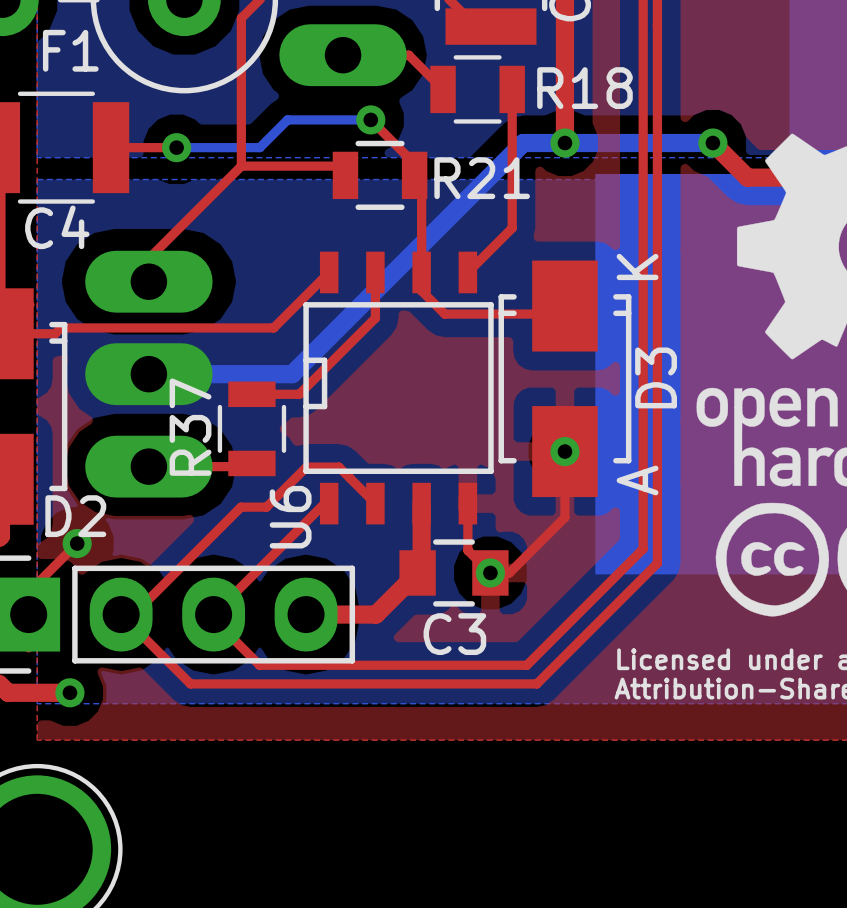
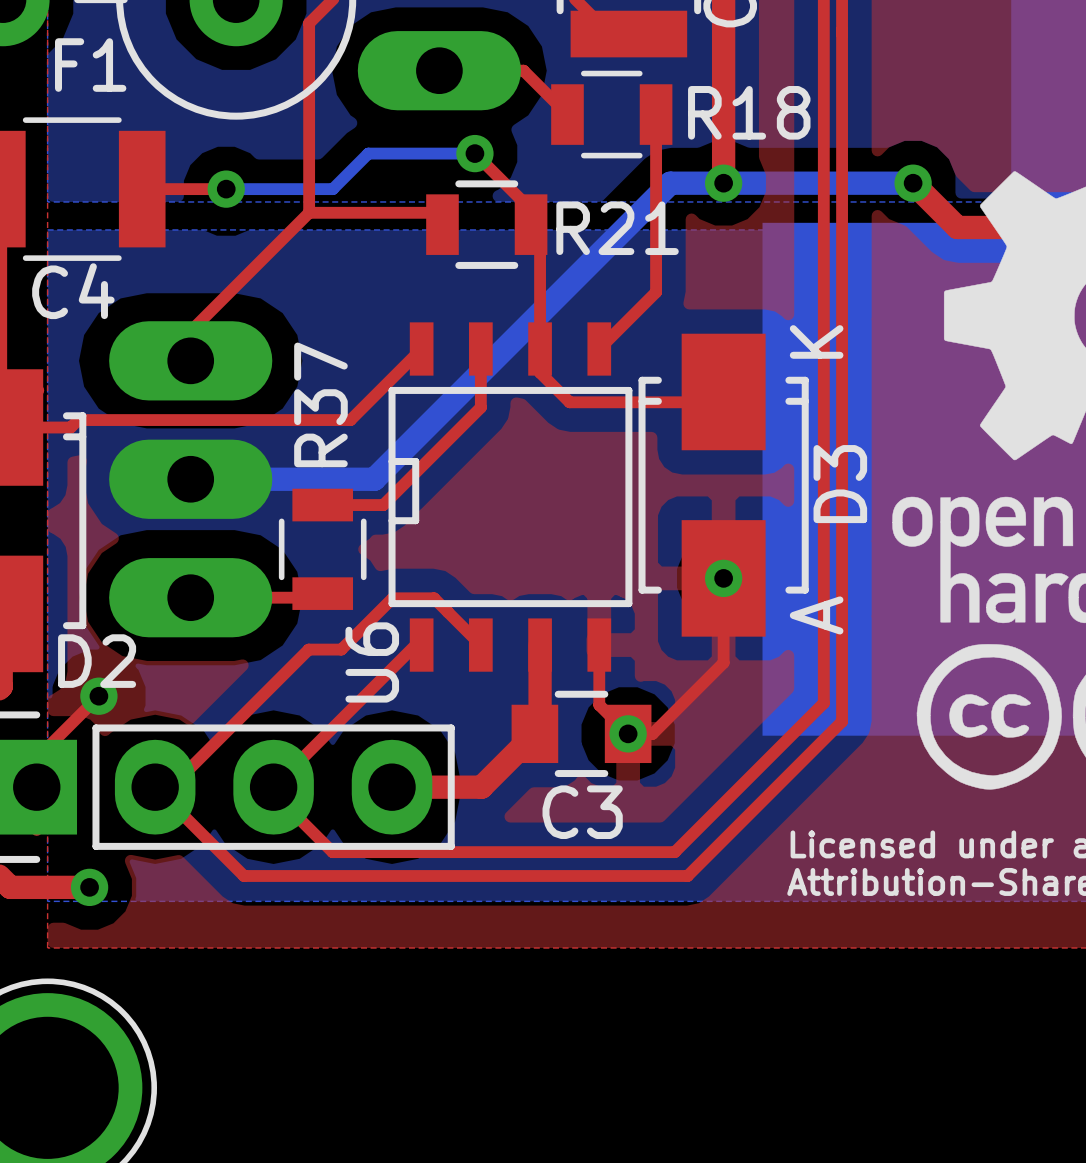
R37 name position: R37 (190, 427) -> R37 (320, 404)

